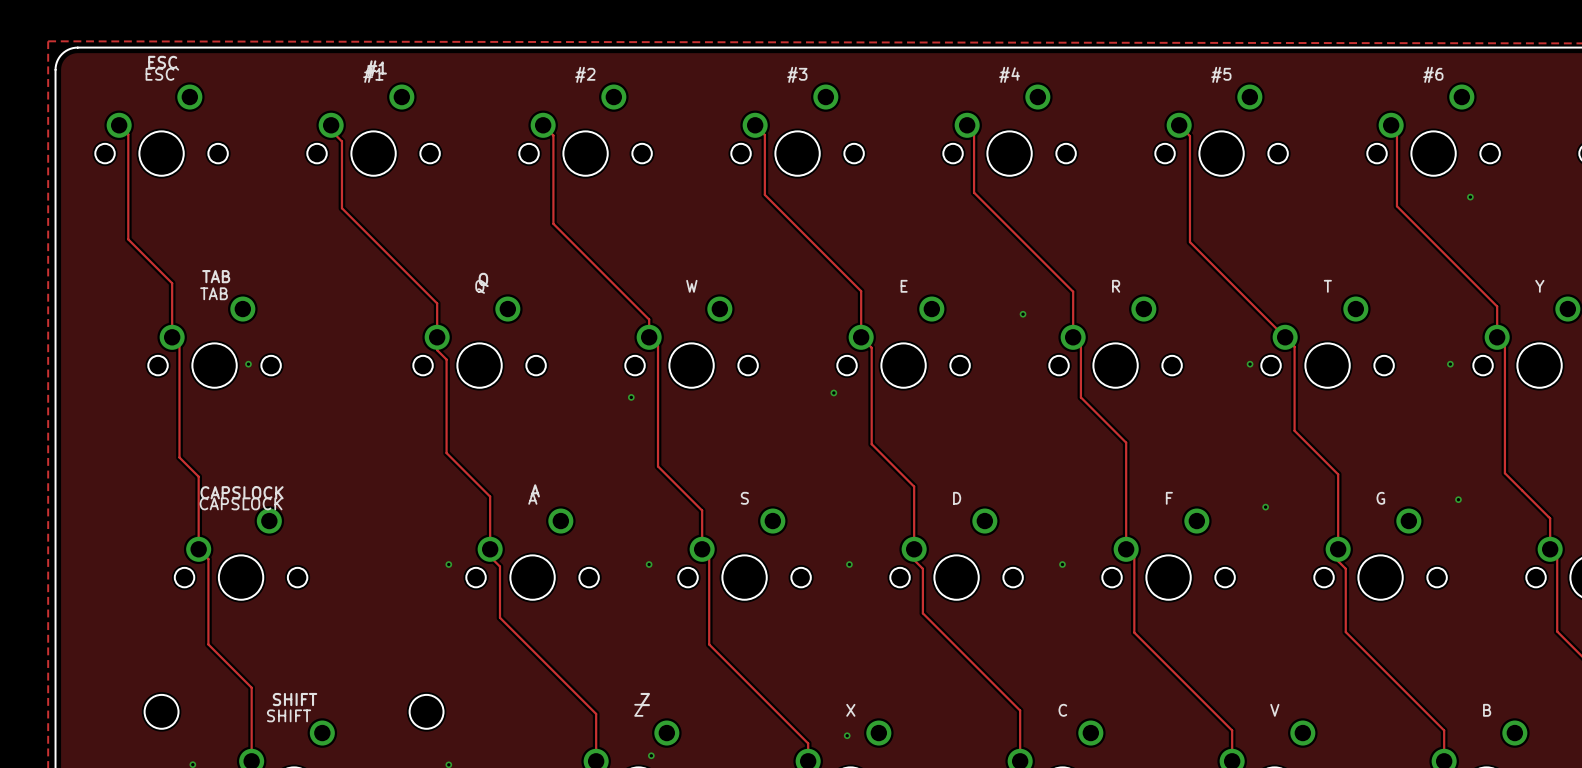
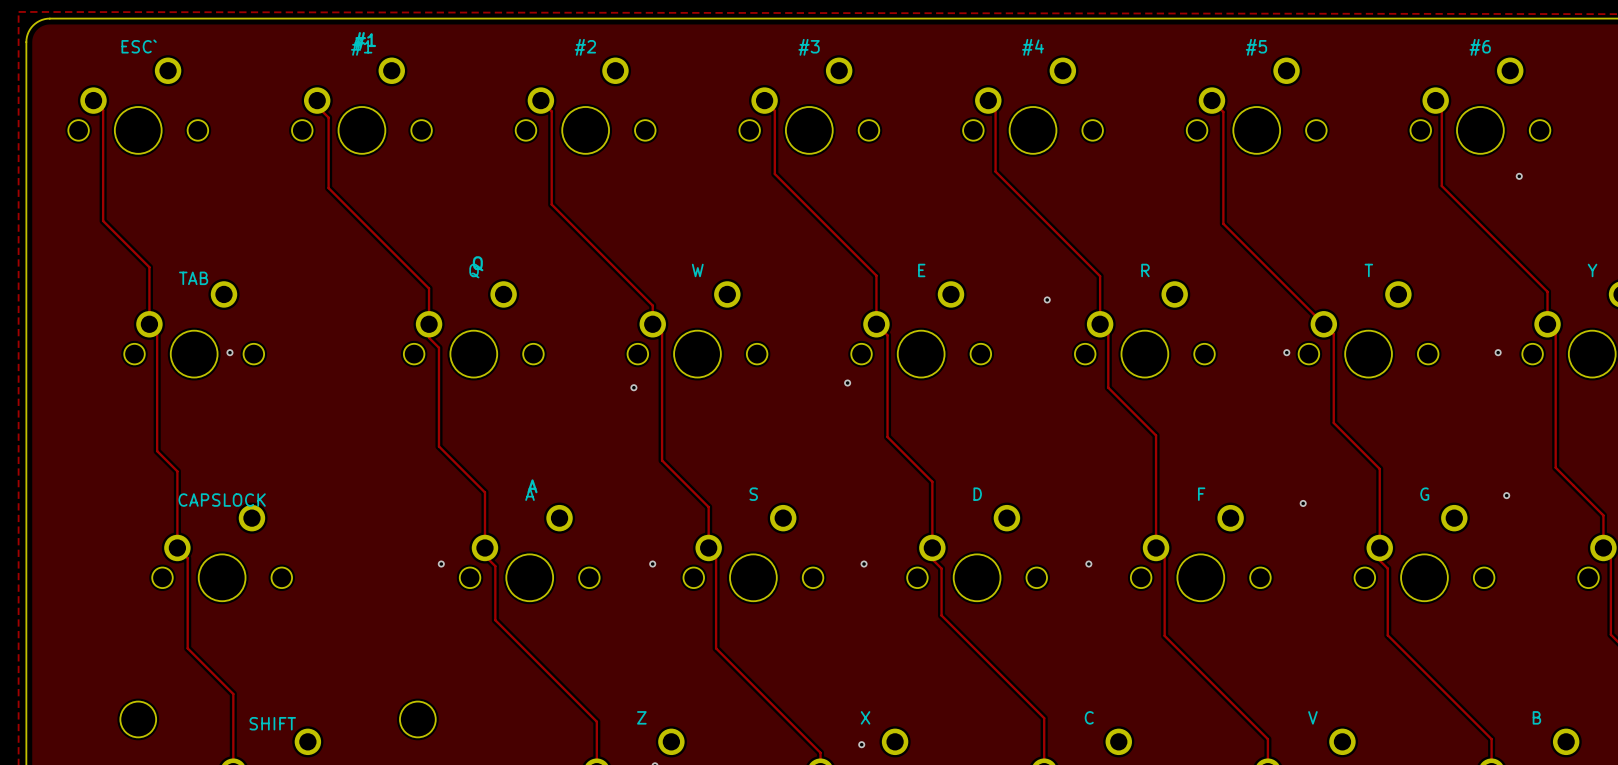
text: ESC (162, 62) -> none
text: TAB (216, 276) -> none
text: CAPSLOCK (242, 492) -> none
text: SHIFT (295, 699) -> none
text: Z (645, 699) -> none

